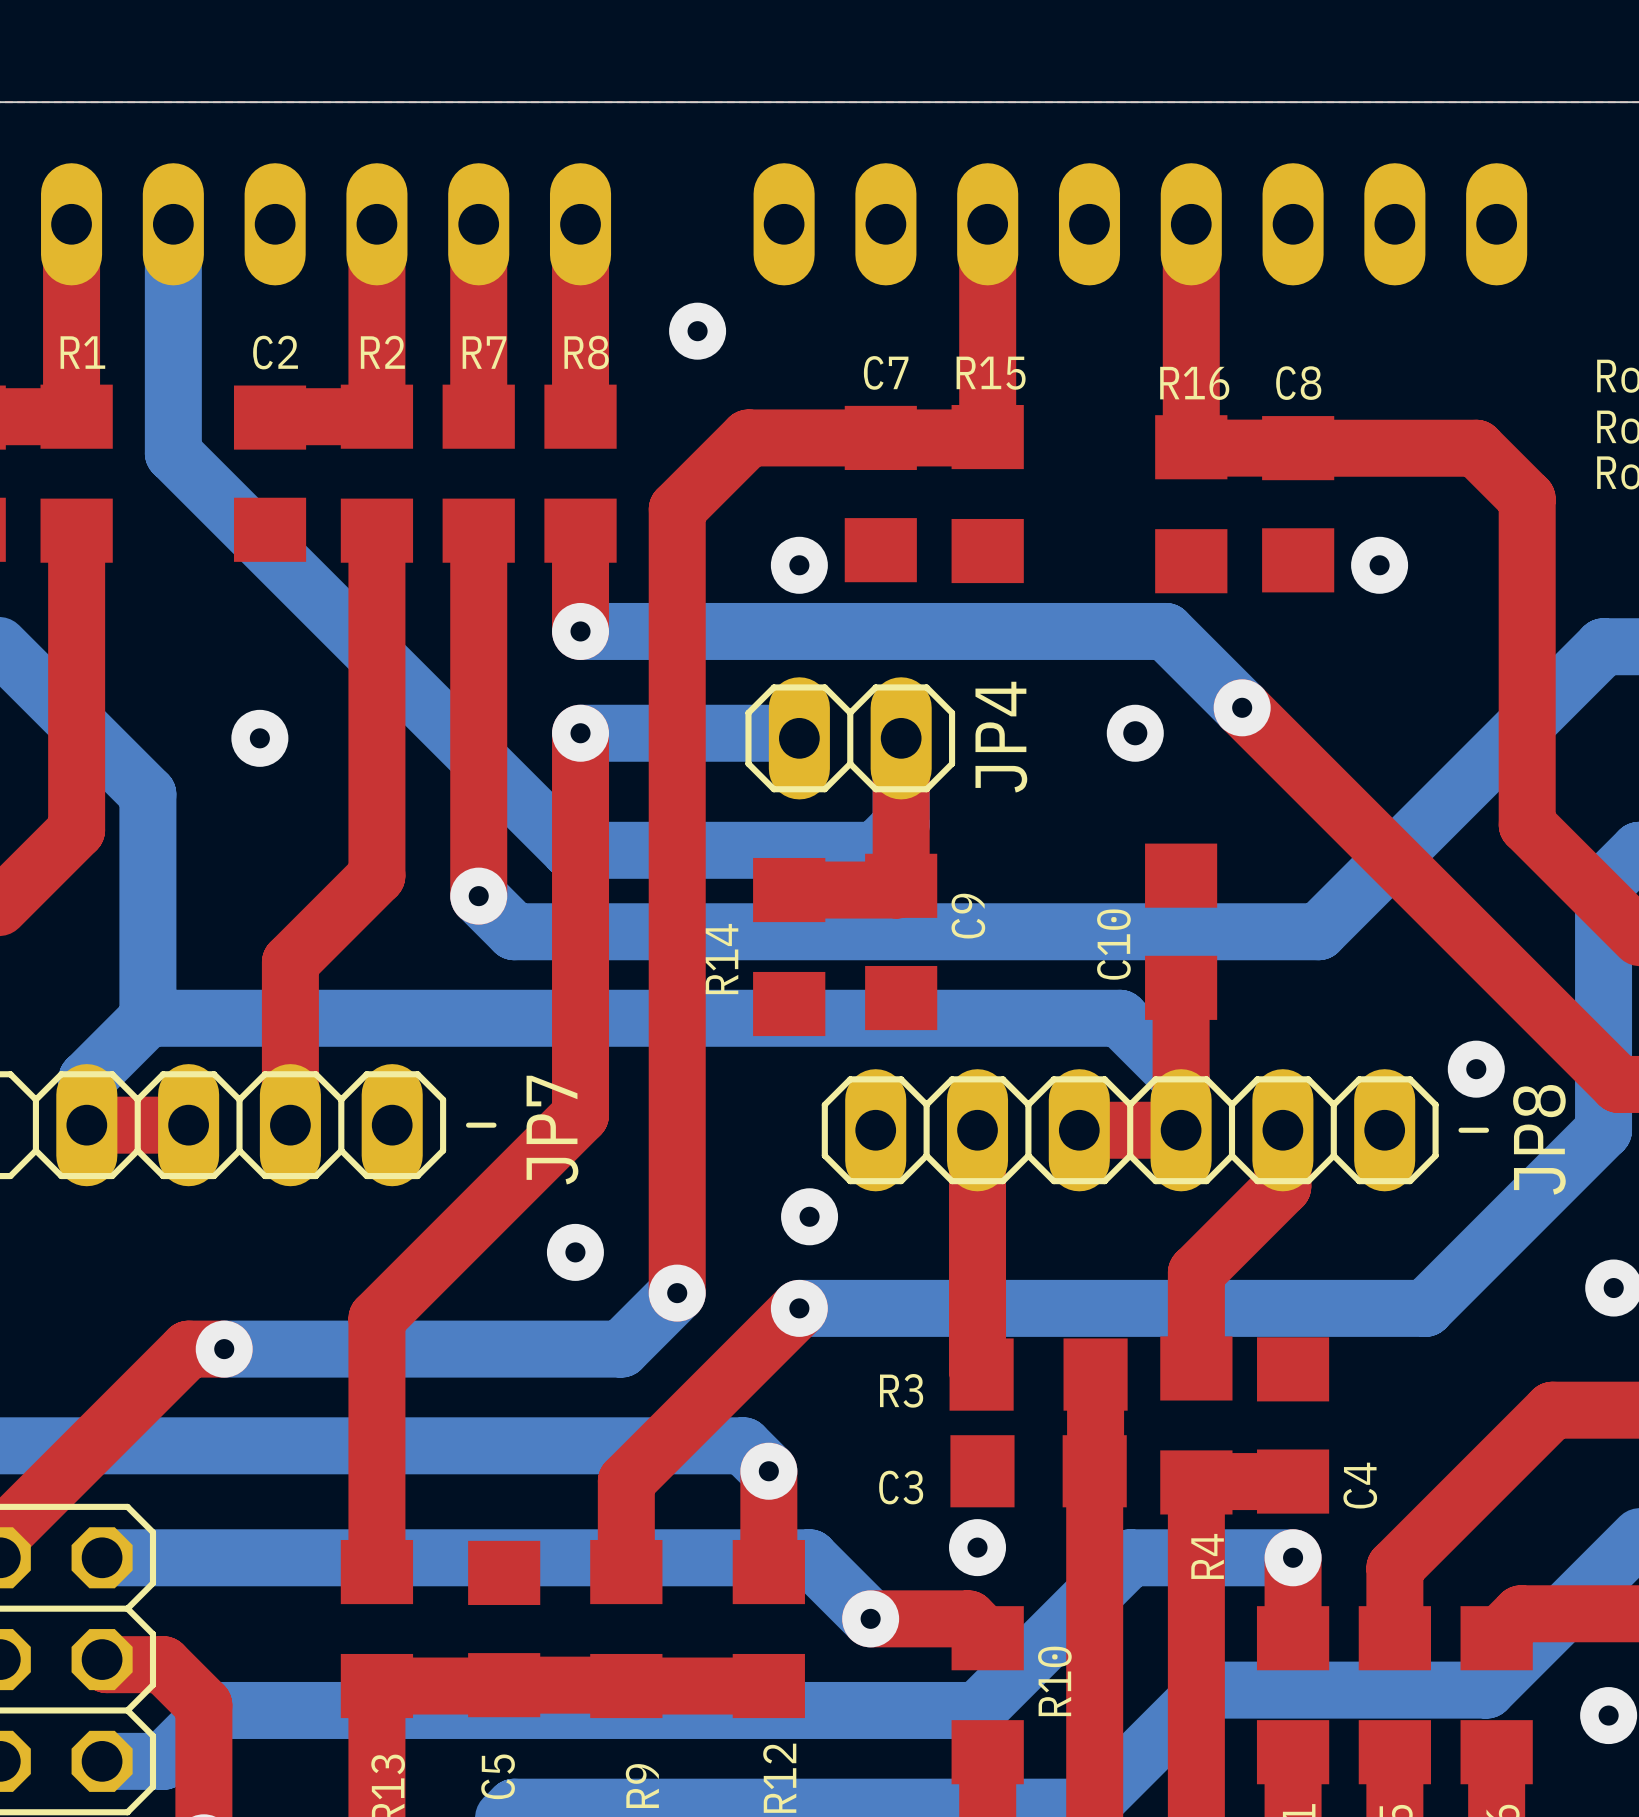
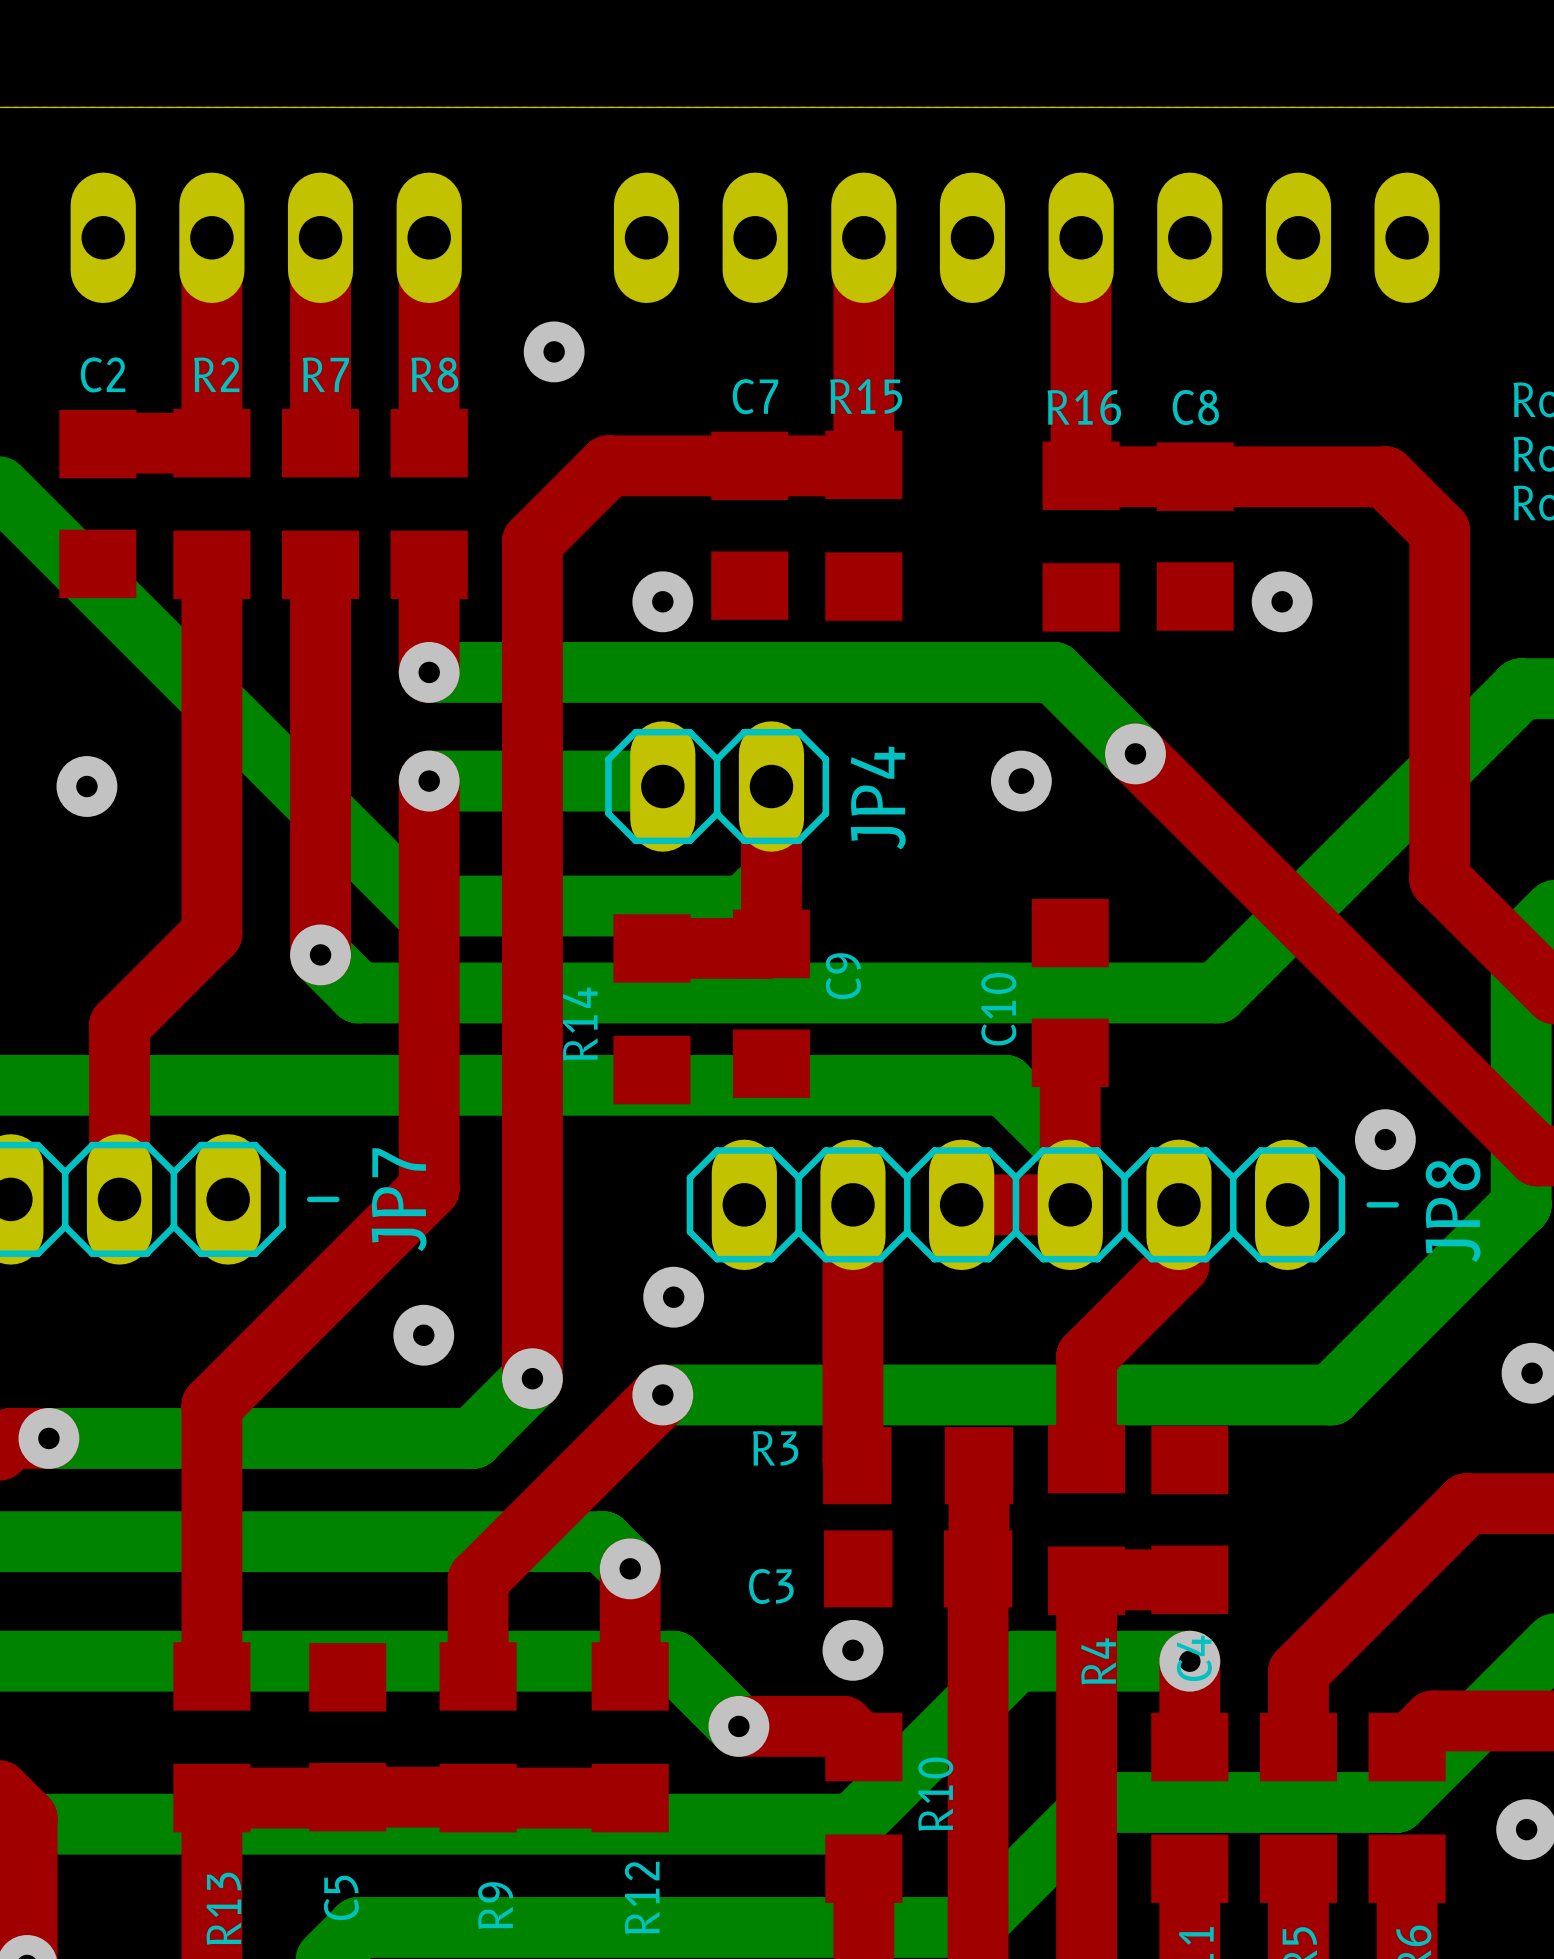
R3 name position: R3 (901, 1390) -> R3 (775, 1448)
C4 name position: C4 (1360, 1485) -> C4 (1194, 1658)

